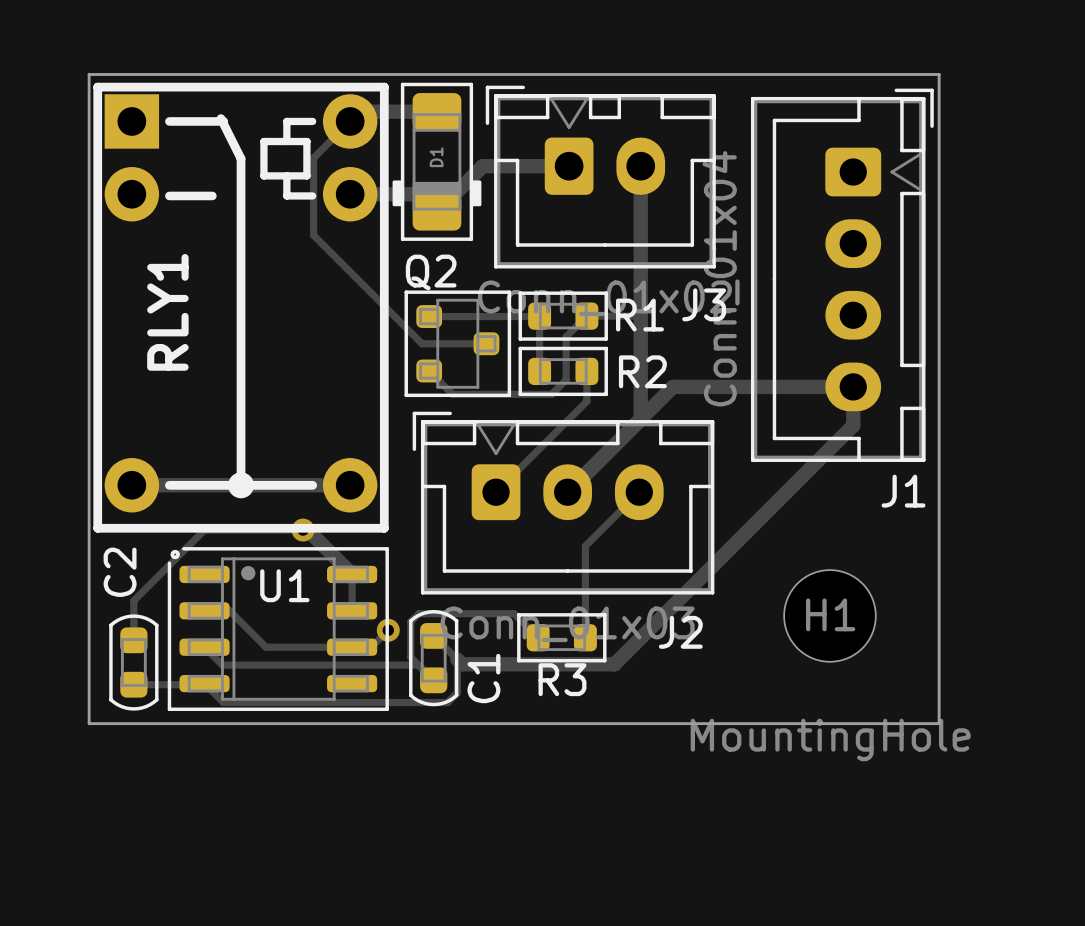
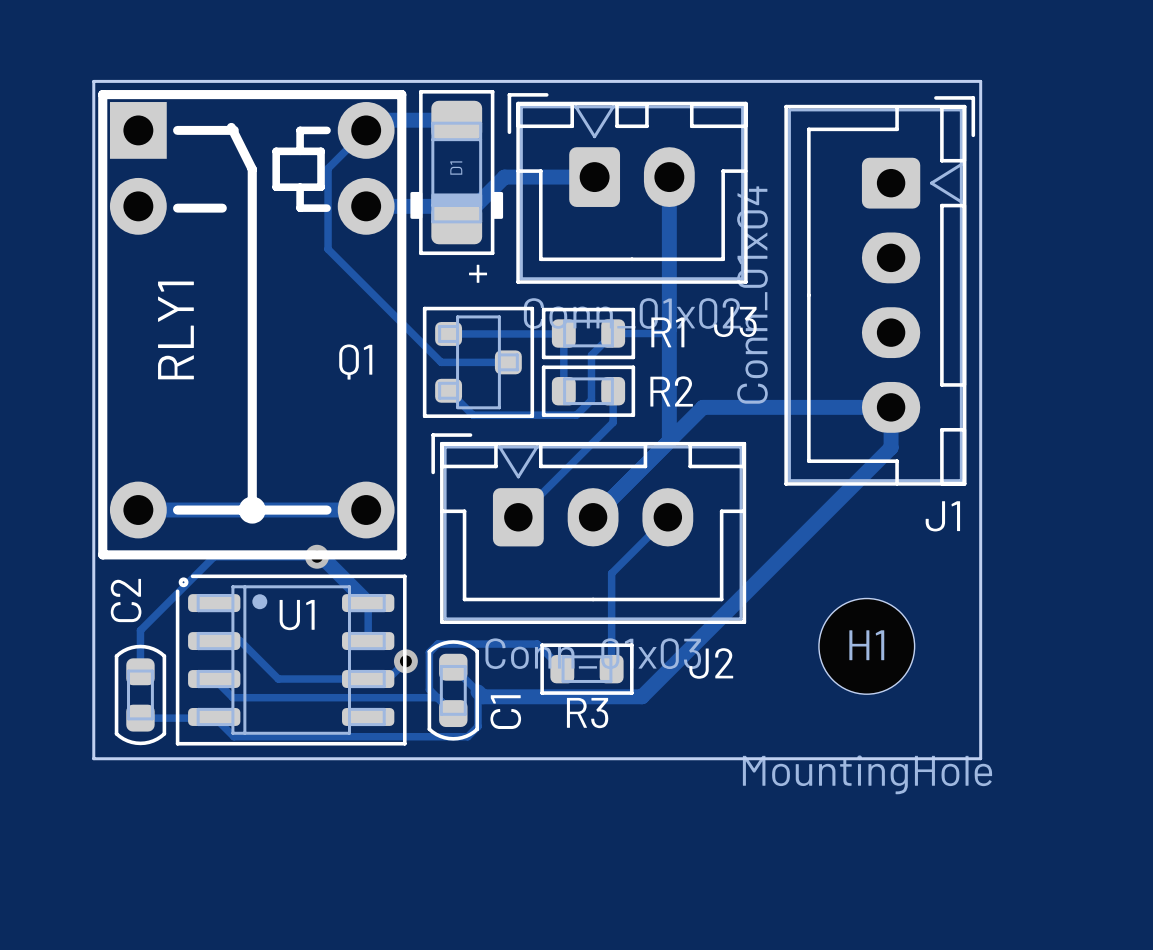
text: none -> + (478, 273)
Q2 name: Q2 (431, 272) -> Q1 (355, 362)

